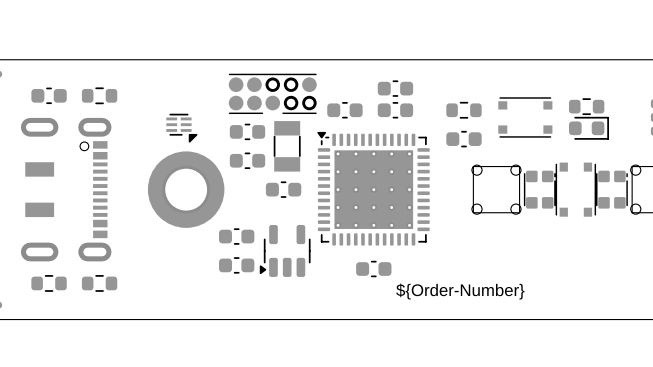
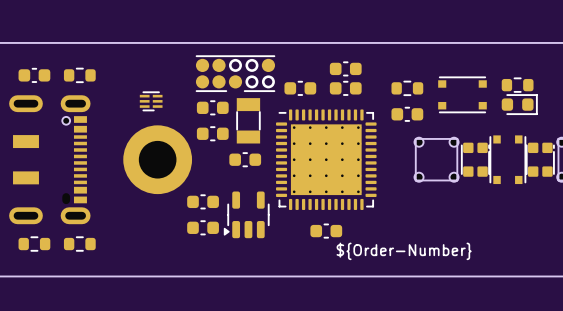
part footprint: [166, 113, 198, 143] -> [139, 91, 163, 112]
part footprint: [317, 131, 430, 246] -> [276, 109, 377, 210]

